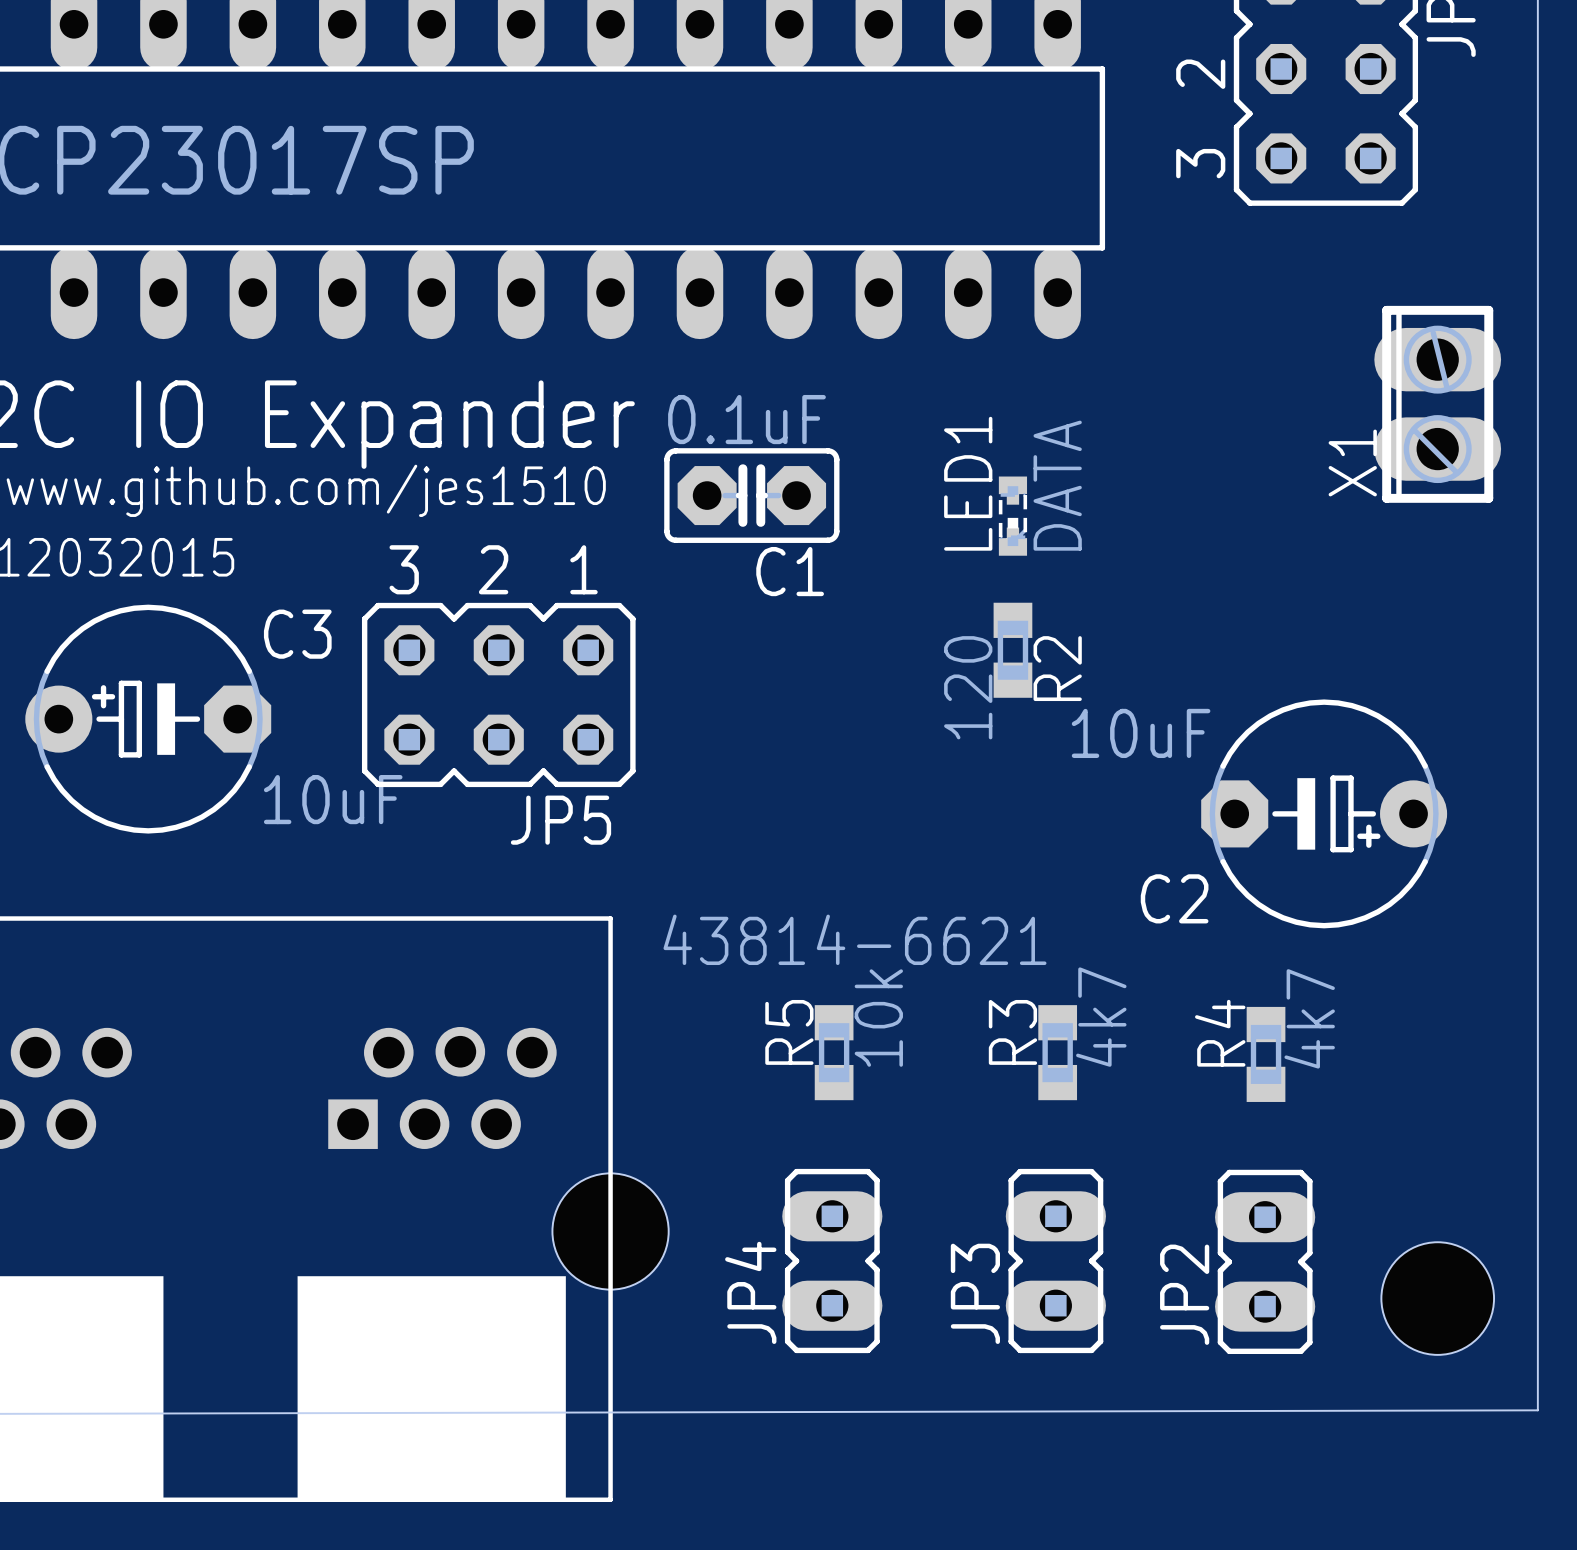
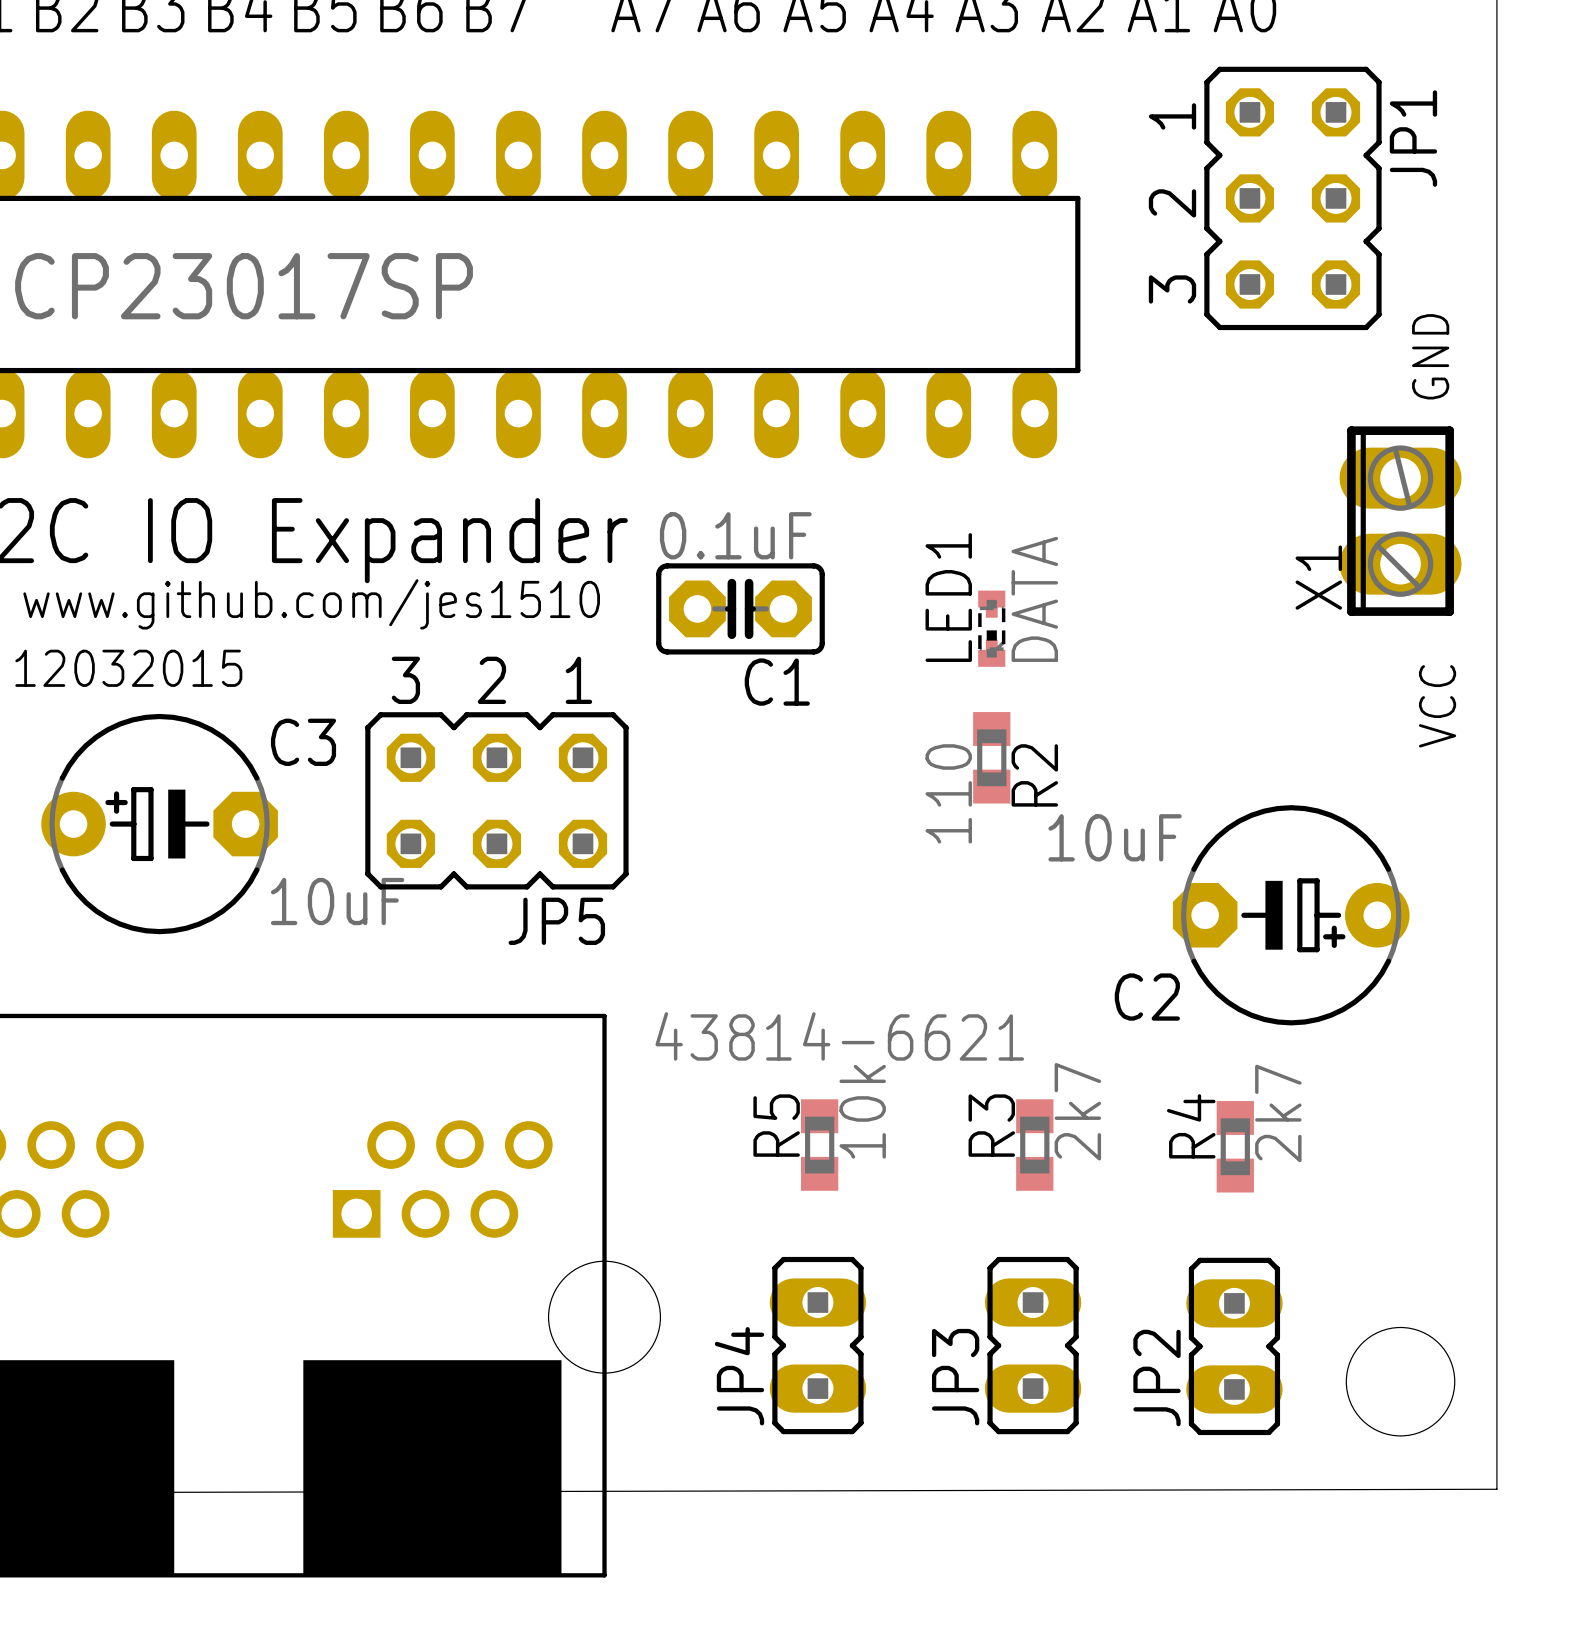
text: none -> GND (1430, 356)
text: none -> VCC (1437, 706)
R2 value: 120 (968, 687) -> 110 (948, 793)
R3 value: 4k7 (1101, 1017) -> 2k7 (1077, 1111)
R4 value: 4k7 (1309, 1018) -> 2k7 (1278, 1113)

